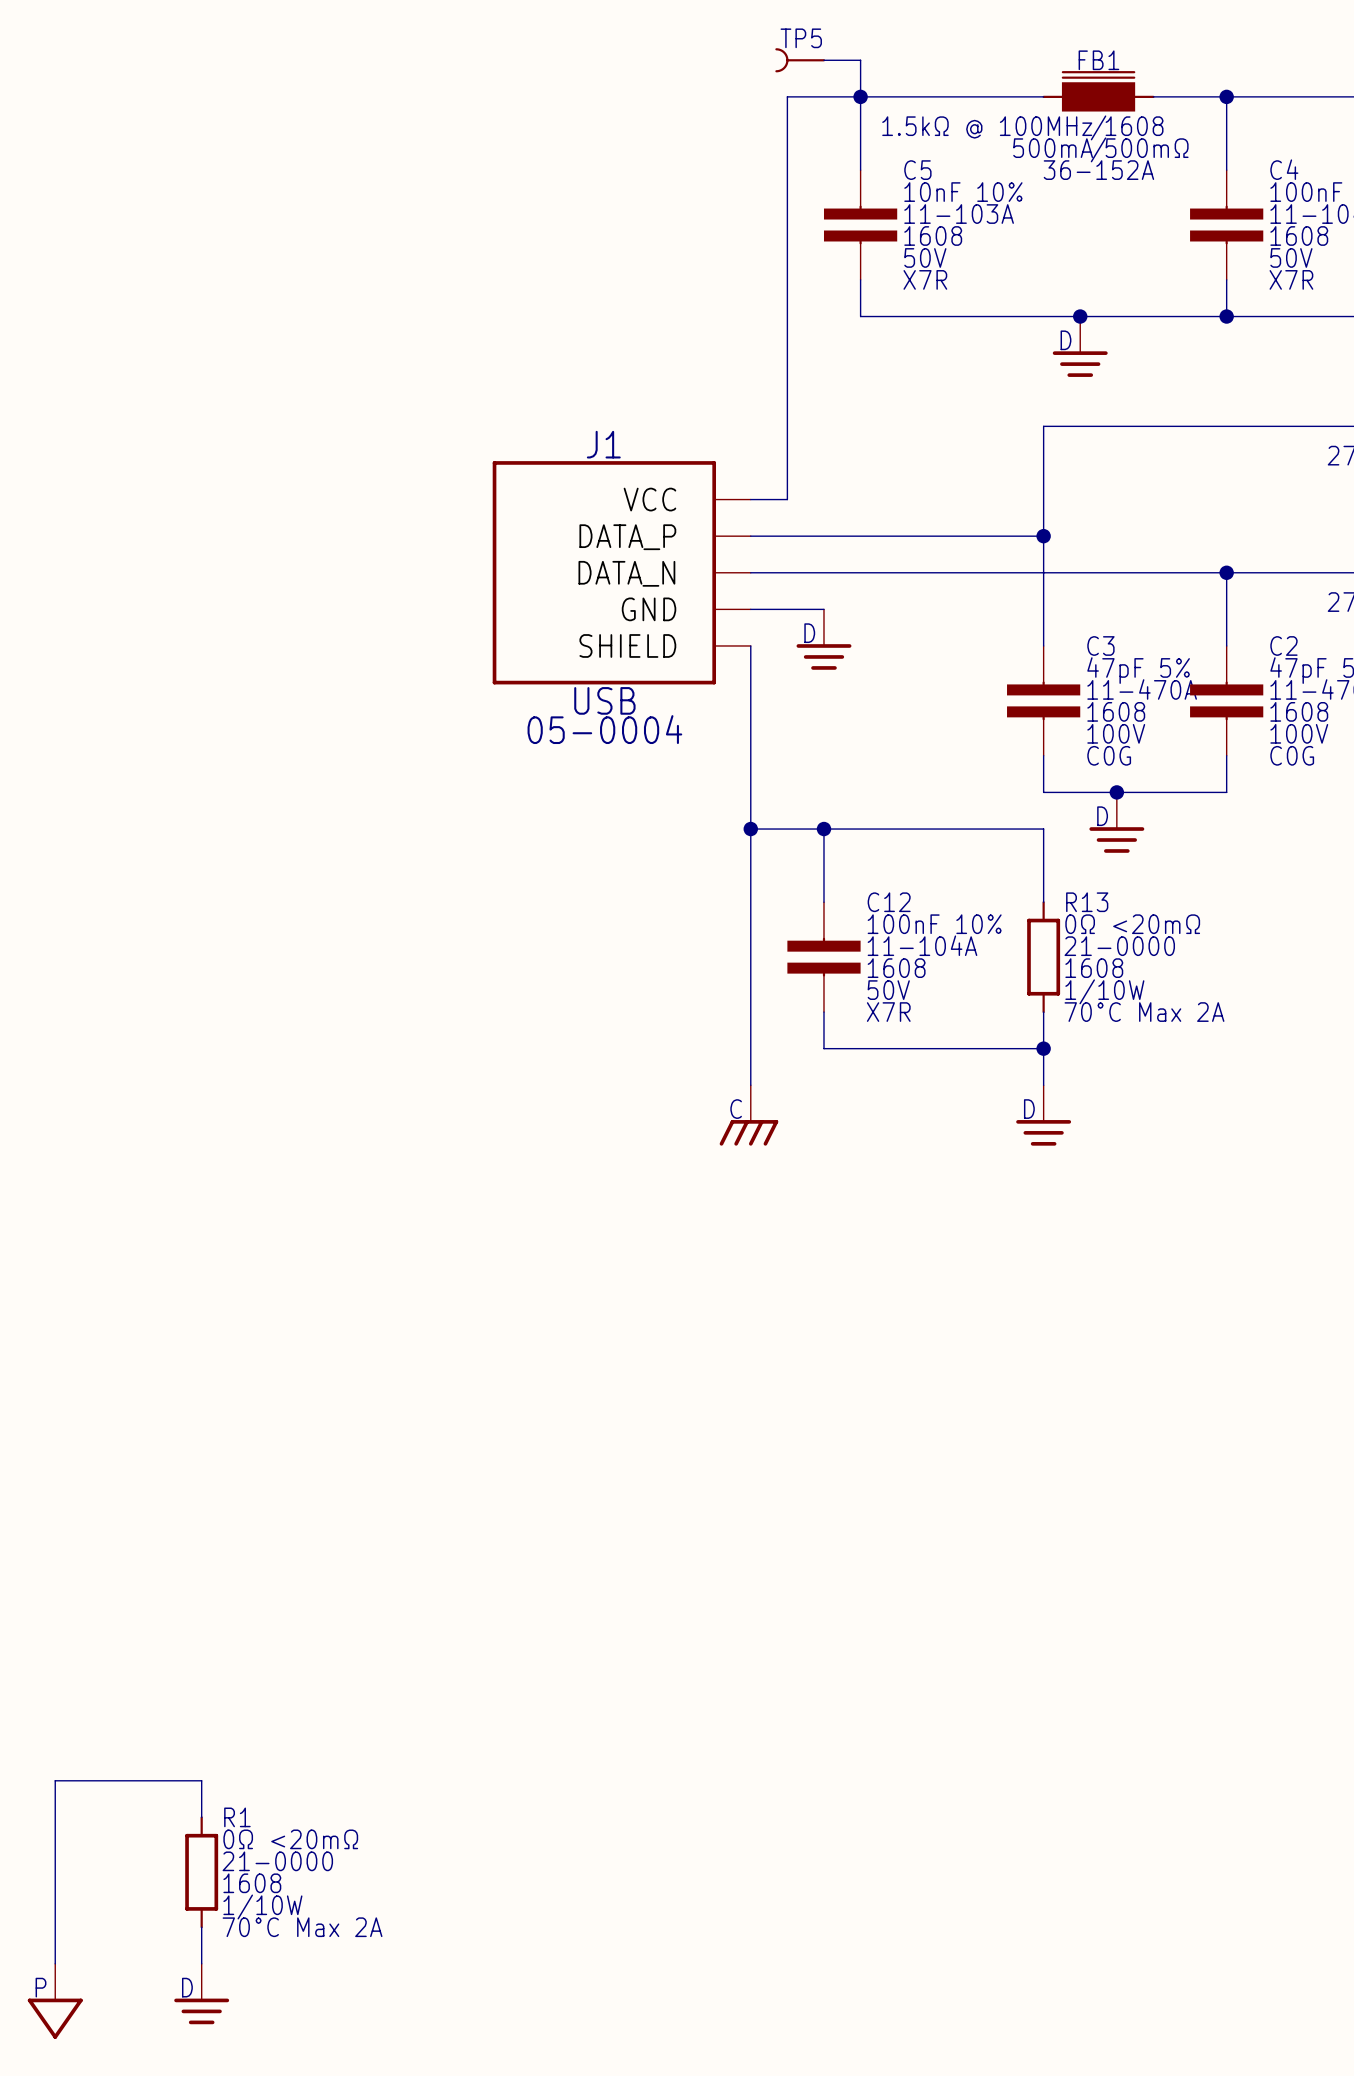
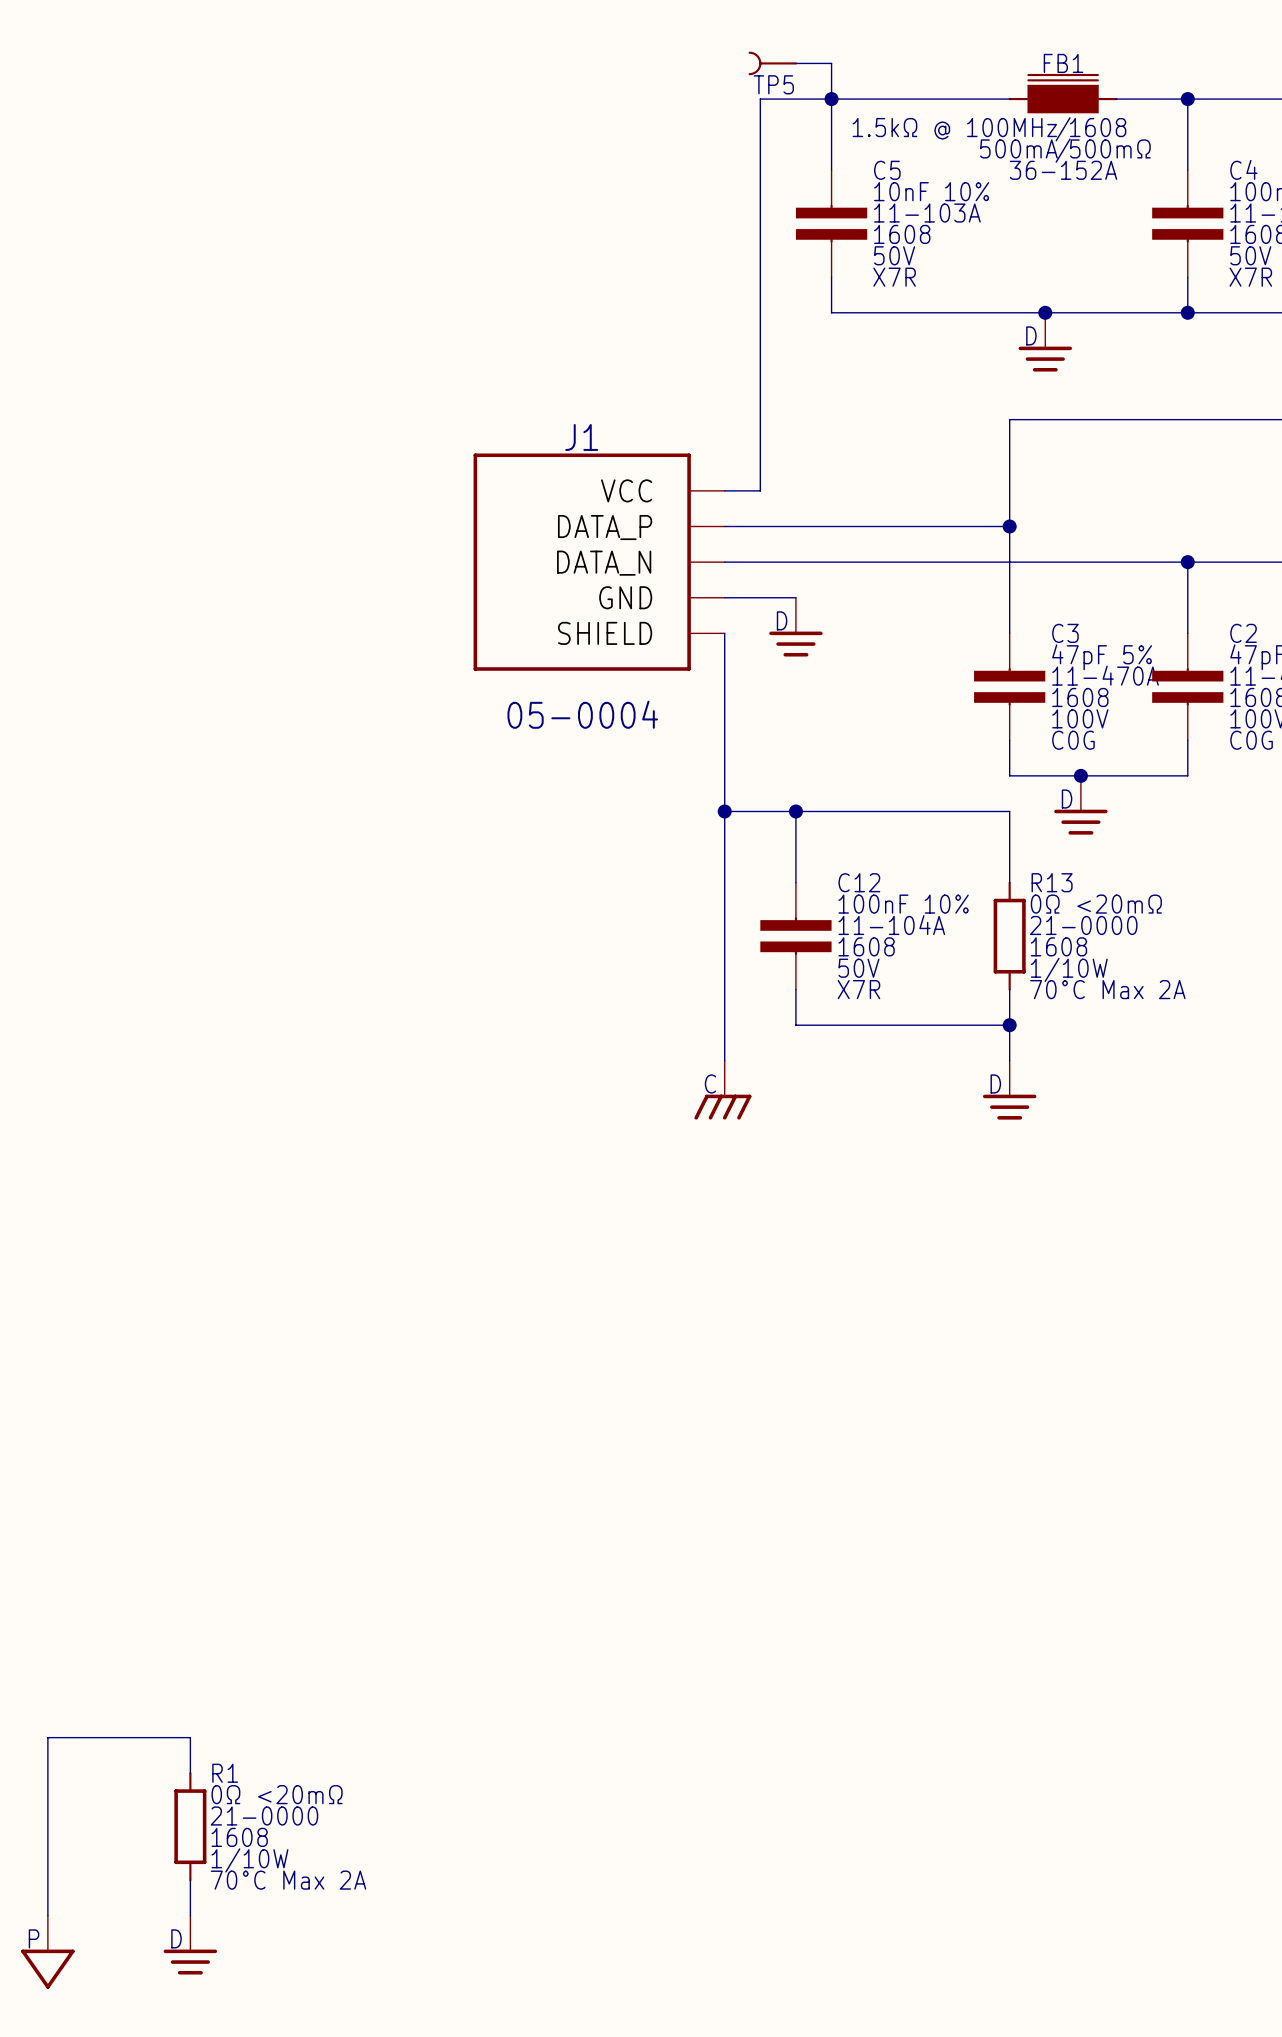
TP5 name position: TP5 (801, 38) -> TP5 (773, 84)
J1 value: USB (604, 700) -> none

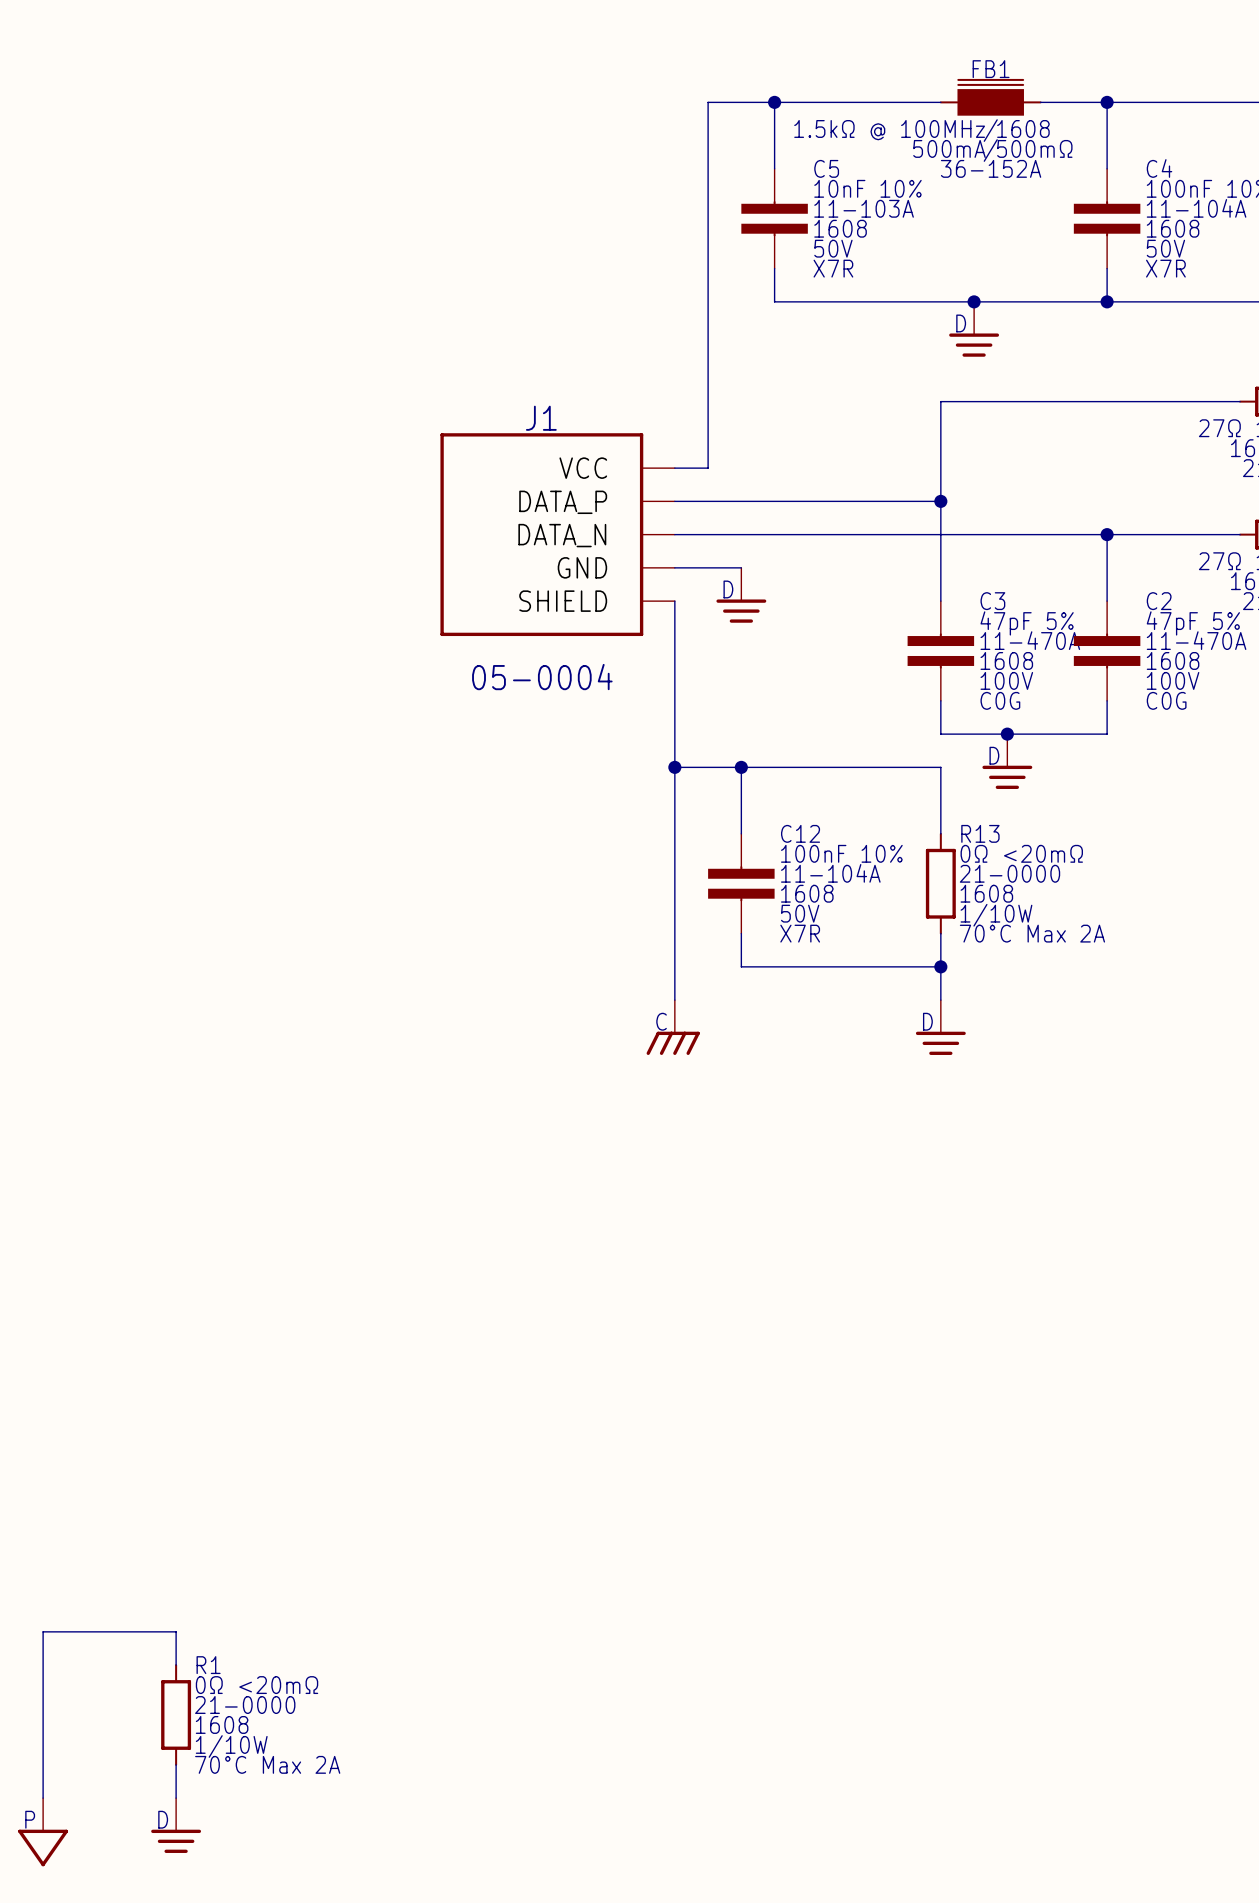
TP5: (772, 63) -> none
wire: (795, 63) (831, 63) (831, 99) -> none

